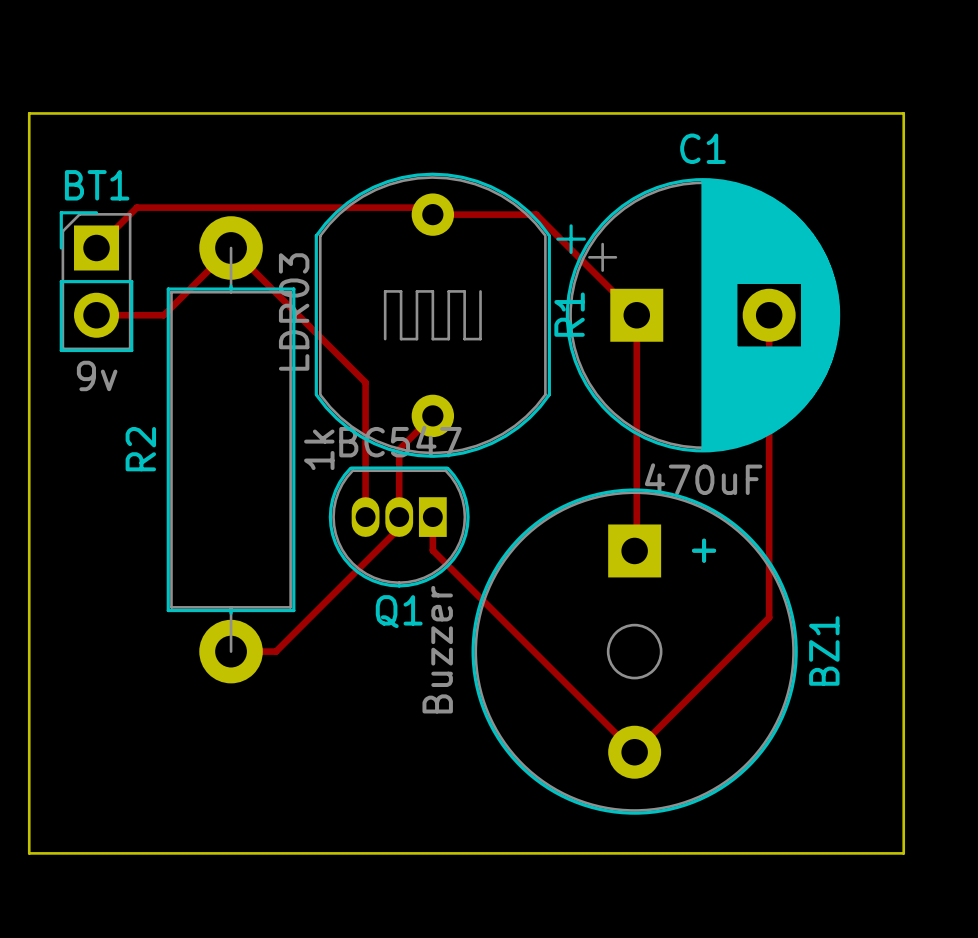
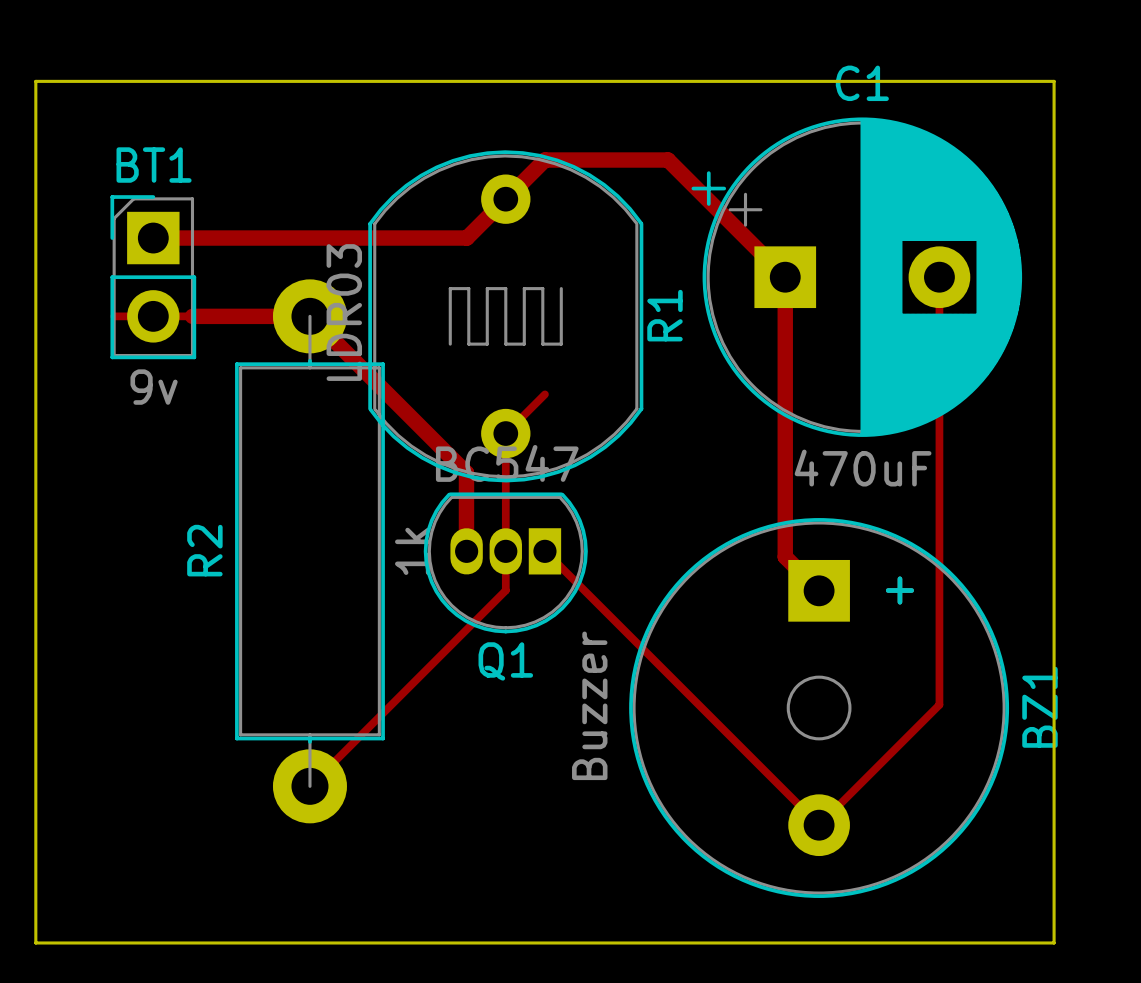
top track: (96, 247) (136, 207) (425, 207) (432, 214) (536, 214) (636, 315) (636, 548) (634, 550) -> none
top track: none -> (153, 238) (466, 238) (544, 160) (668, 160) (785, 277) (785, 556) (819, 590)
BT1 position: (96, 281) -> (153, 277)
top track: none -> (939, 277) (939, 704) (819, 825) (545, 551)
top track: (163, 315) (231, 247) (365, 382) (365, 517) -> (192, 316) (309, 316) (466, 472) (466, 551)
C1 position: (698, 315) -> (856, 277)
top track: (769, 315) (769, 617) (634, 752) (432, 550) -> (309, 786) (505, 590)
top track: none -> (544, 394) (505, 433) (505, 551)
top track: (432, 415) (399, 449) (399, 528) (275, 651) (231, 651) -> none
R2 position: (231, 449) -> (309, 551)
Q1 position: (399, 526) -> (505, 562)
BZ1 position: (634, 651) -> (819, 708)

